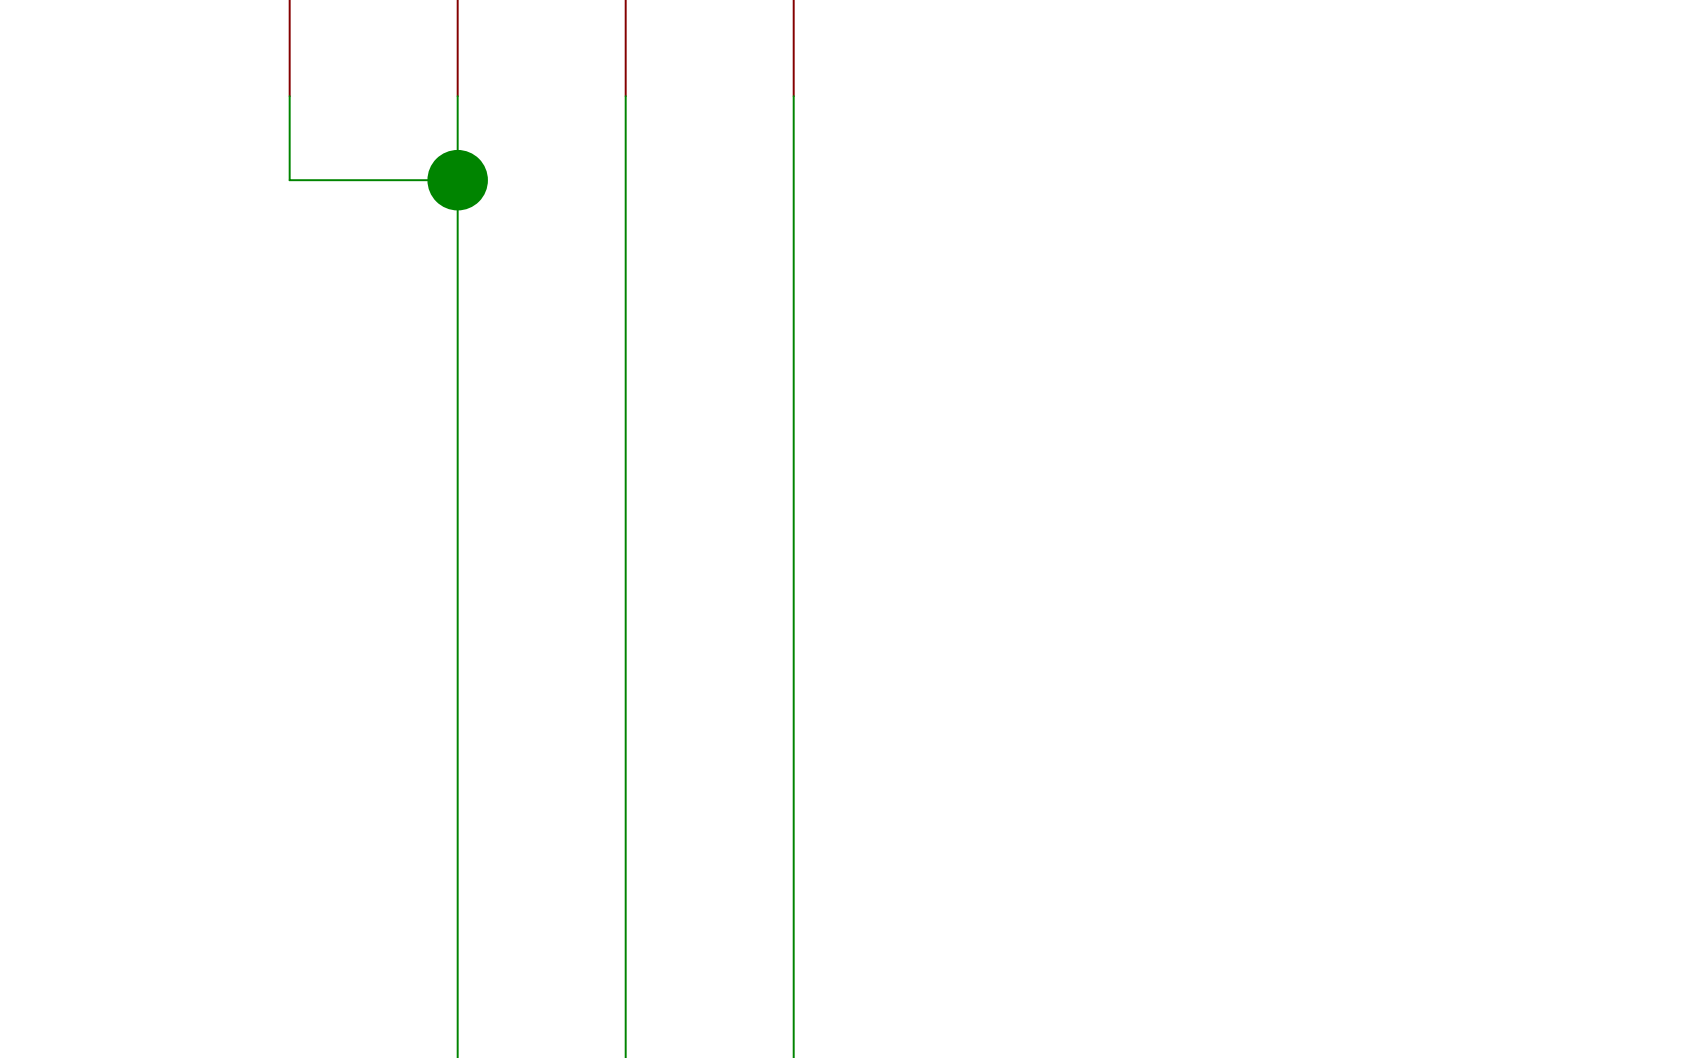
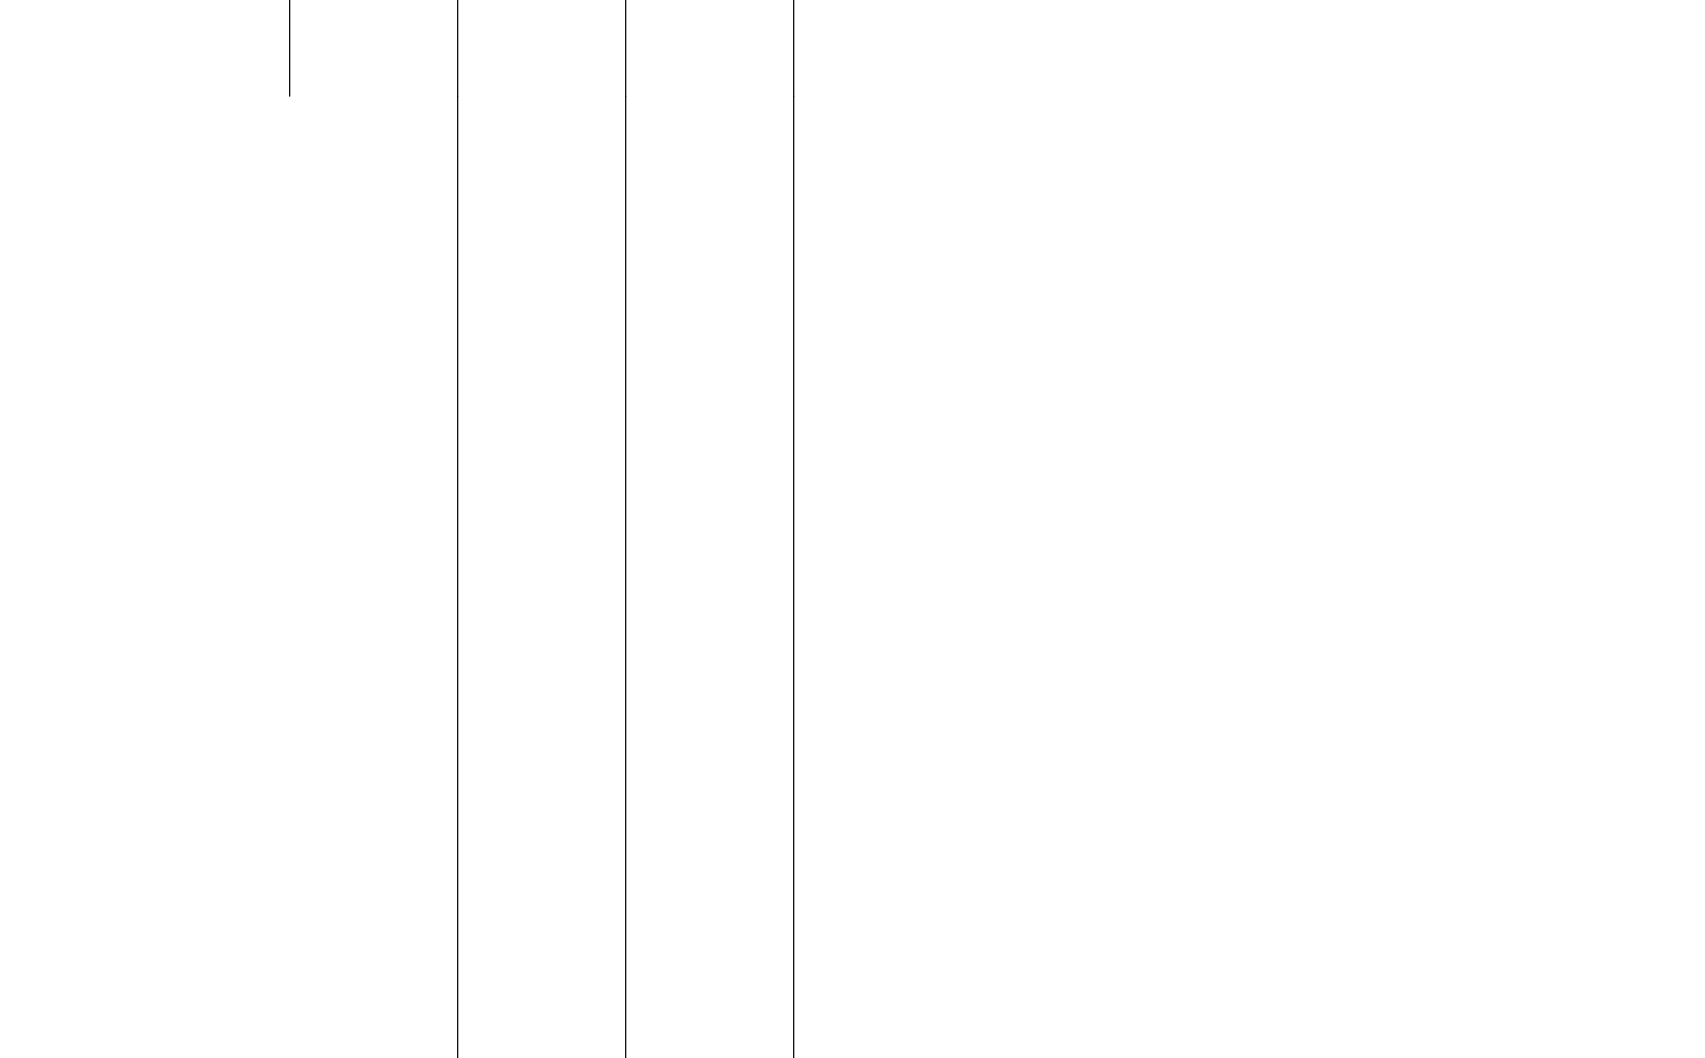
wire: (289, 96) (289, 180) (457, 180) -> none
junction: (457, 180) -> none

